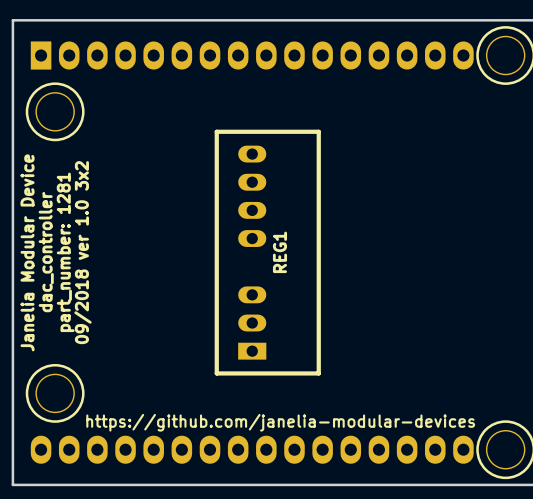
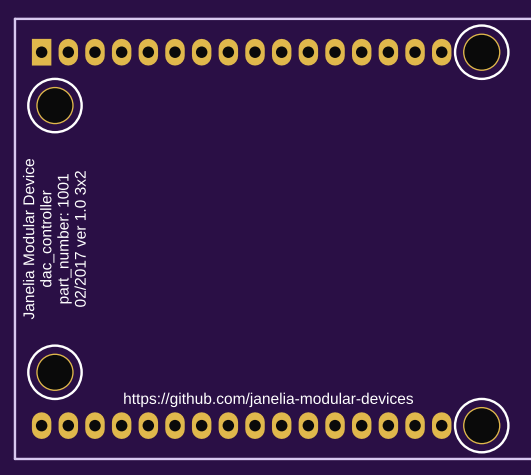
text: part_number: 1281 (65, 252) -> part_number: 1001 (64, 238)
text: 09/2018 ver 1.0 3x2 (83, 252) -> 02/2017 ver 1.0 3x2 (80, 239)
REG1: (267, 252) -> none

